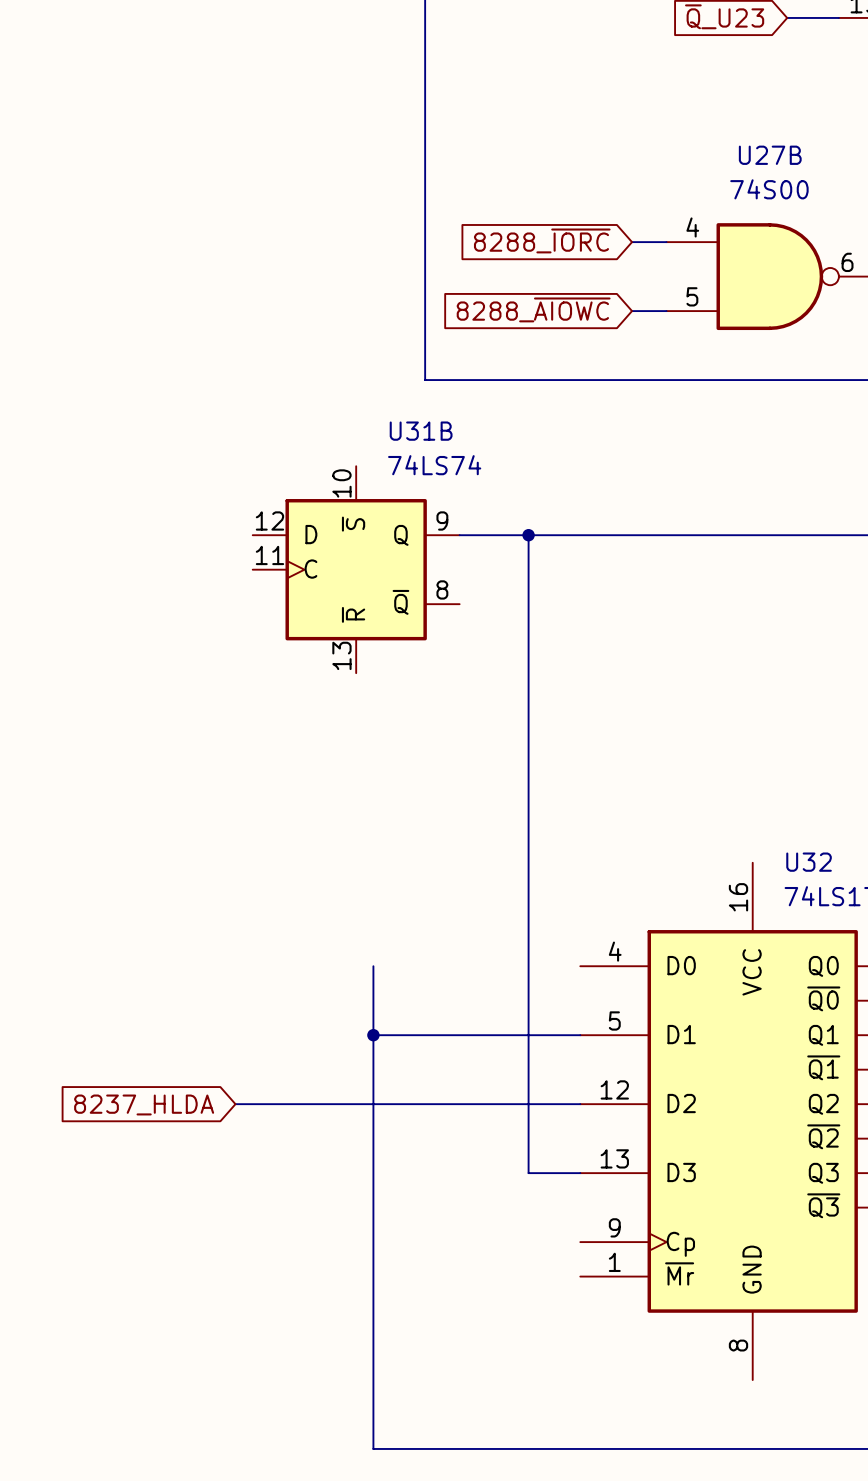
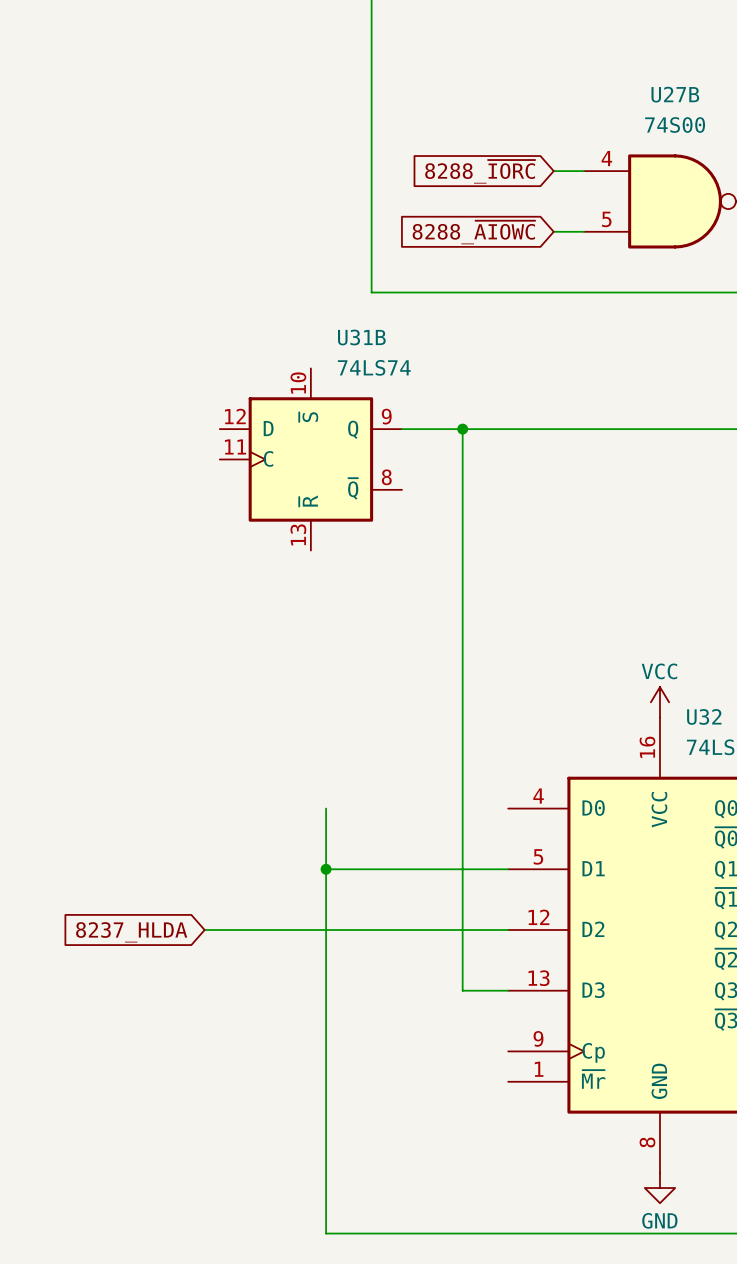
power symbol: none -> VCC (659, 702)
power symbol: none -> GND (659, 1188)

